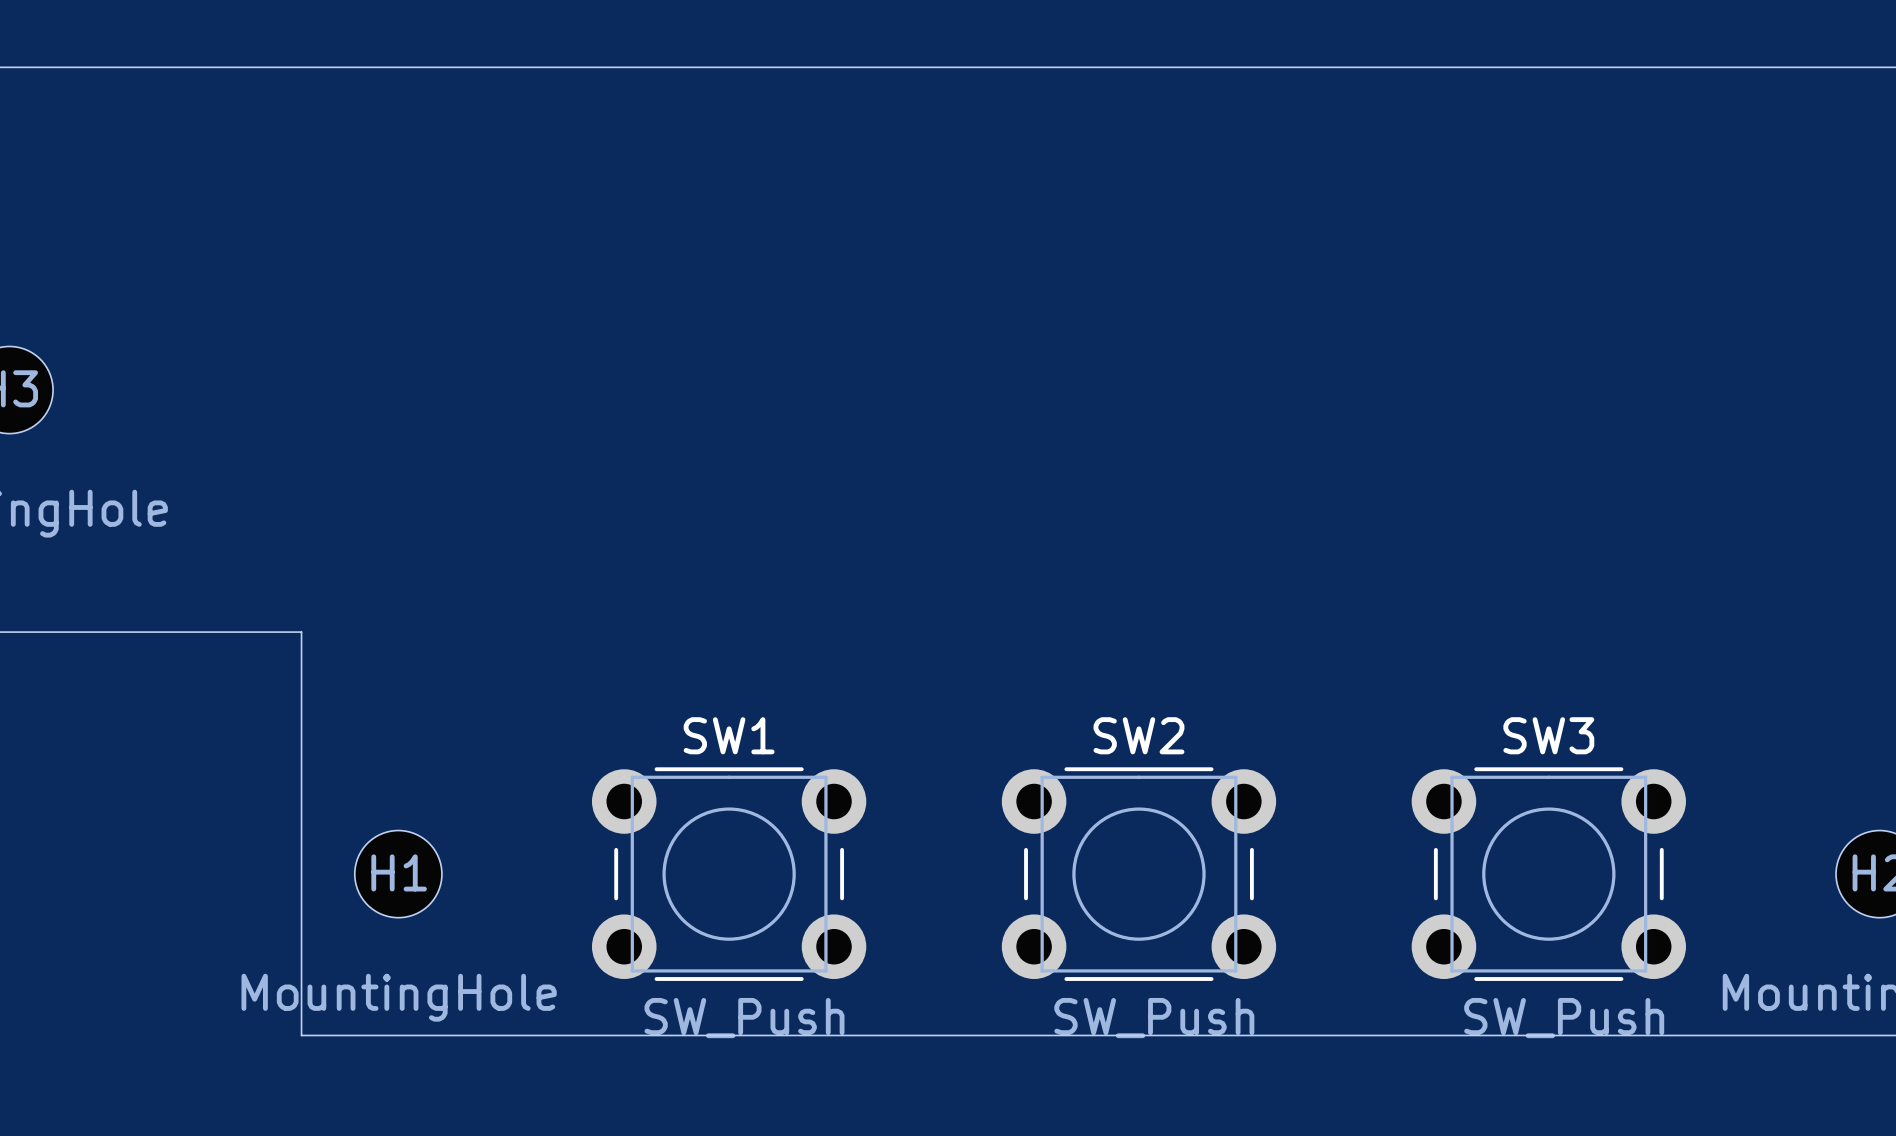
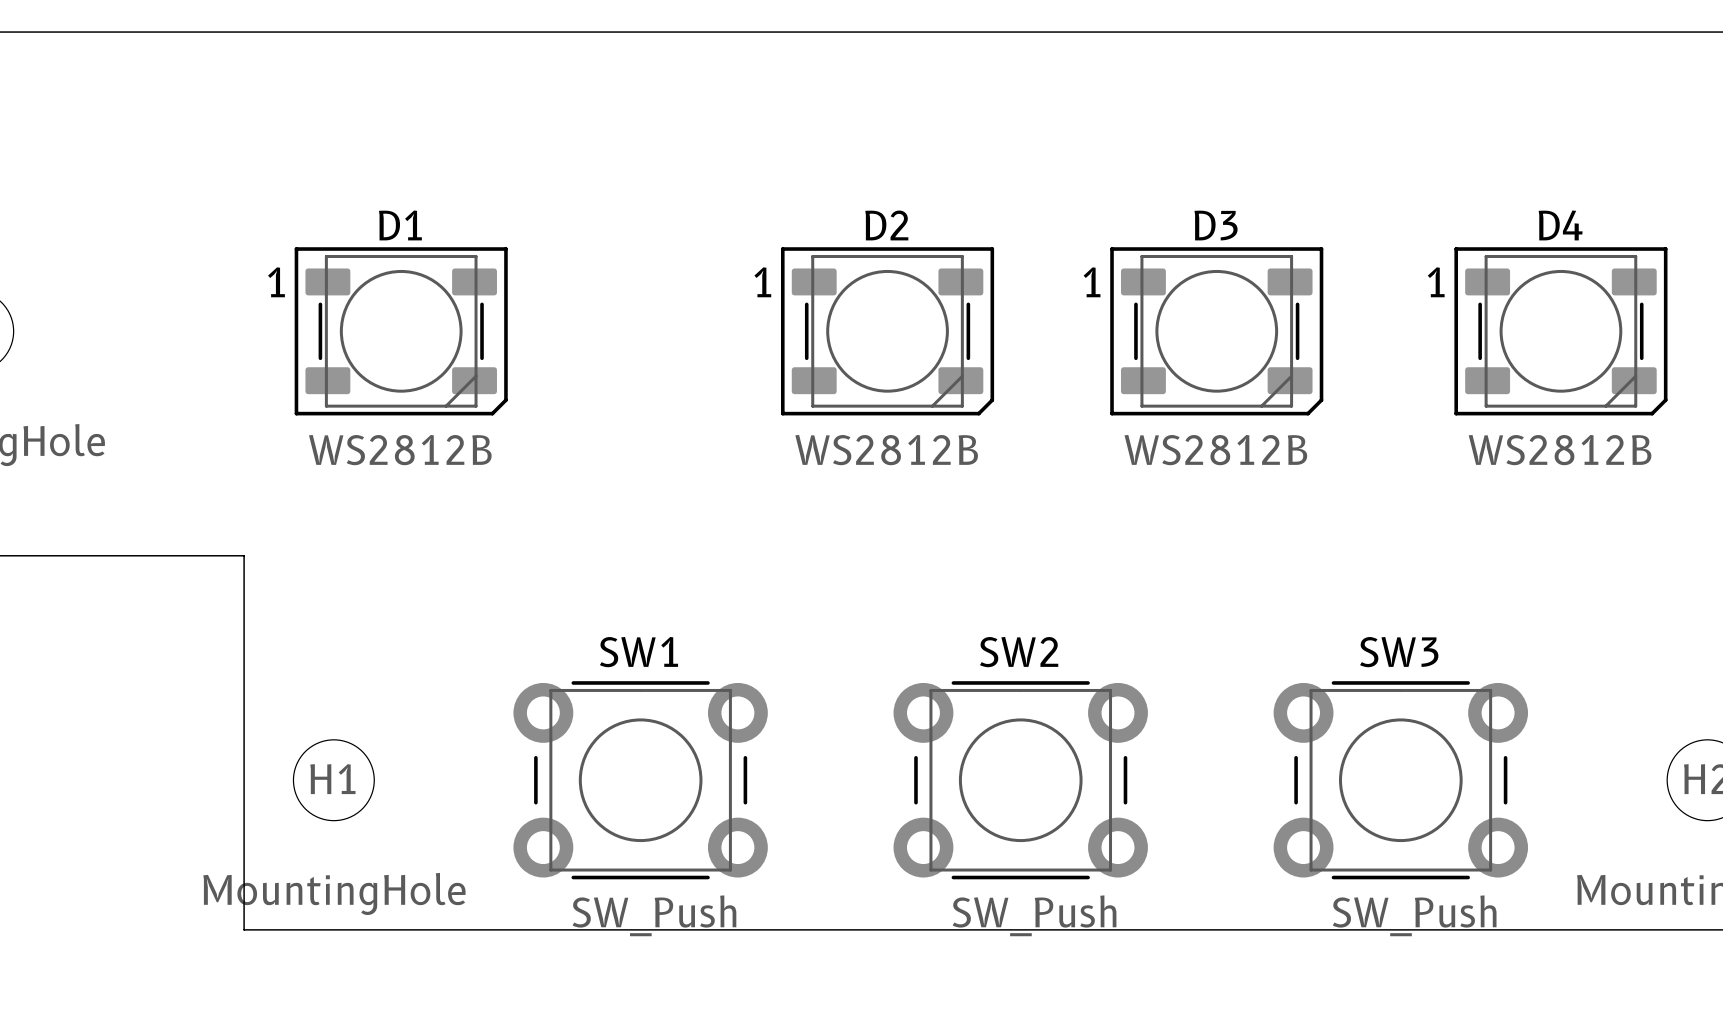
D1: none -> WS2812B (401, 331)
D2: none -> WS2812B (887, 331)
D3: none -> WS2812B (1216, 331)
D4: none -> WS2812B (1560, 331)

